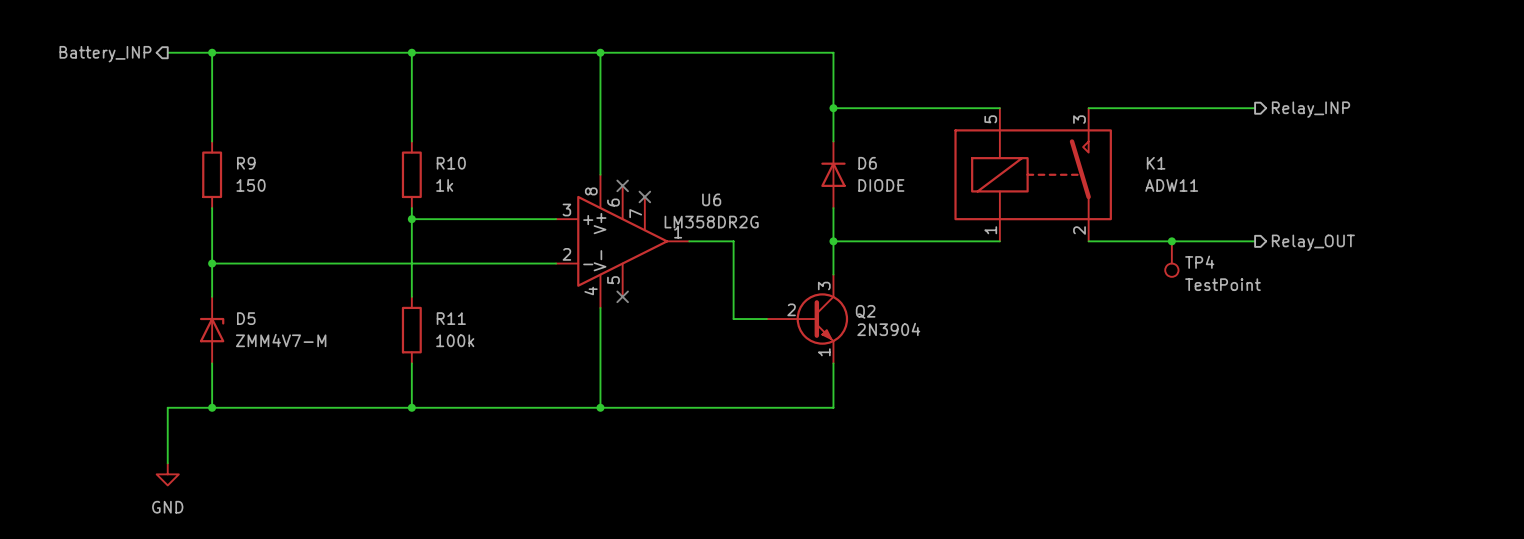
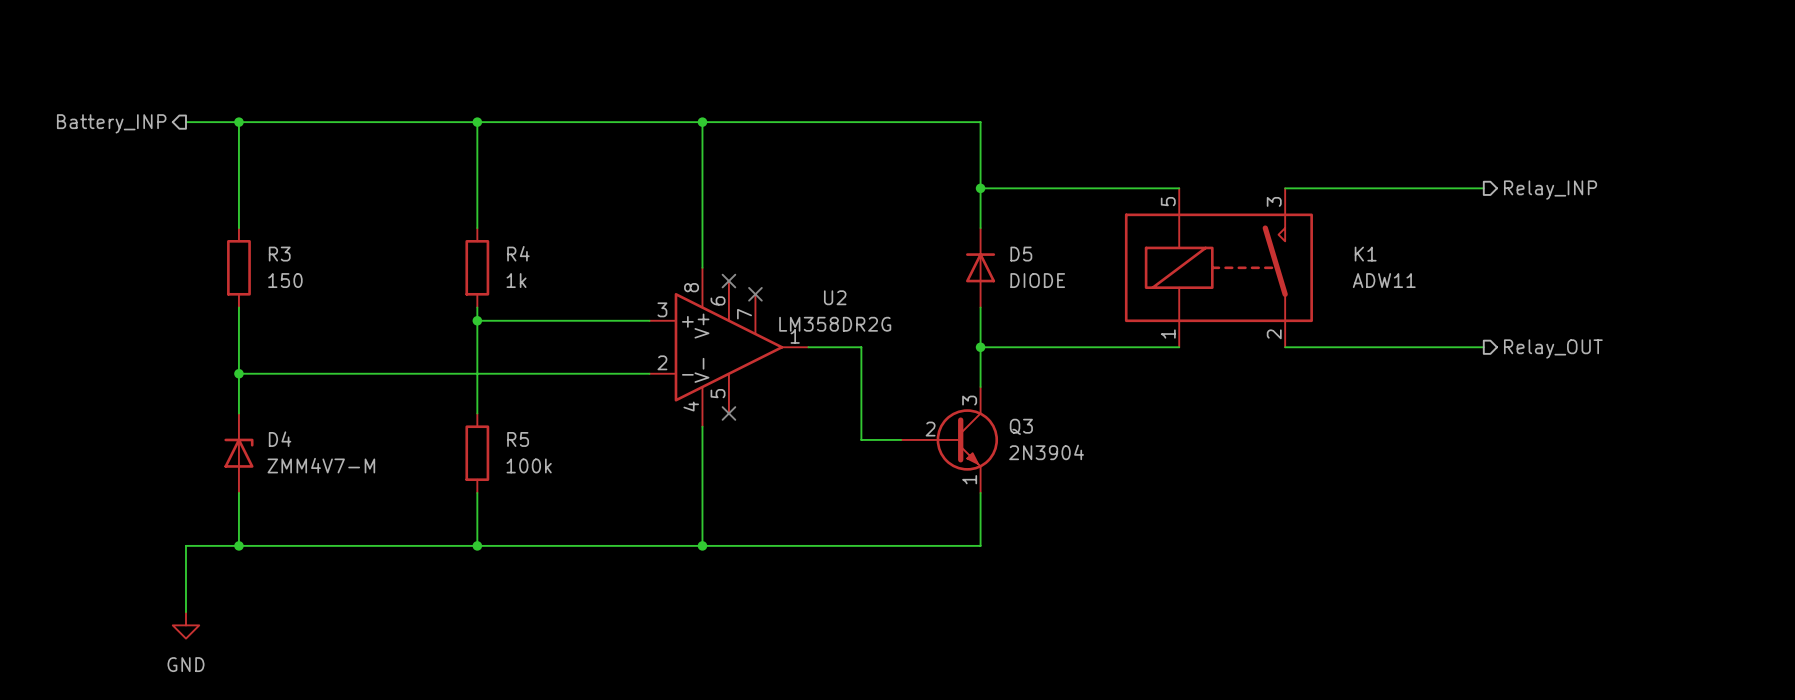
R9 name: R9 (246, 163) -> R3 (279, 254)
R10 name: R10 (451, 163) -> R4 (518, 253)
D6 name: D6 (867, 163) -> D5 (1021, 254)
U6 name: U6 (711, 199) -> U2 (835, 297)
junction: (1171, 241) -> none
TP4: TestPoint (1171, 259) -> none
Q2 name: Q2 (865, 311) -> Q3 (1021, 426)
D5 name: D5 (246, 318) -> D4 (280, 439)
R11 name: R11 (451, 318) -> R5 (518, 439)

